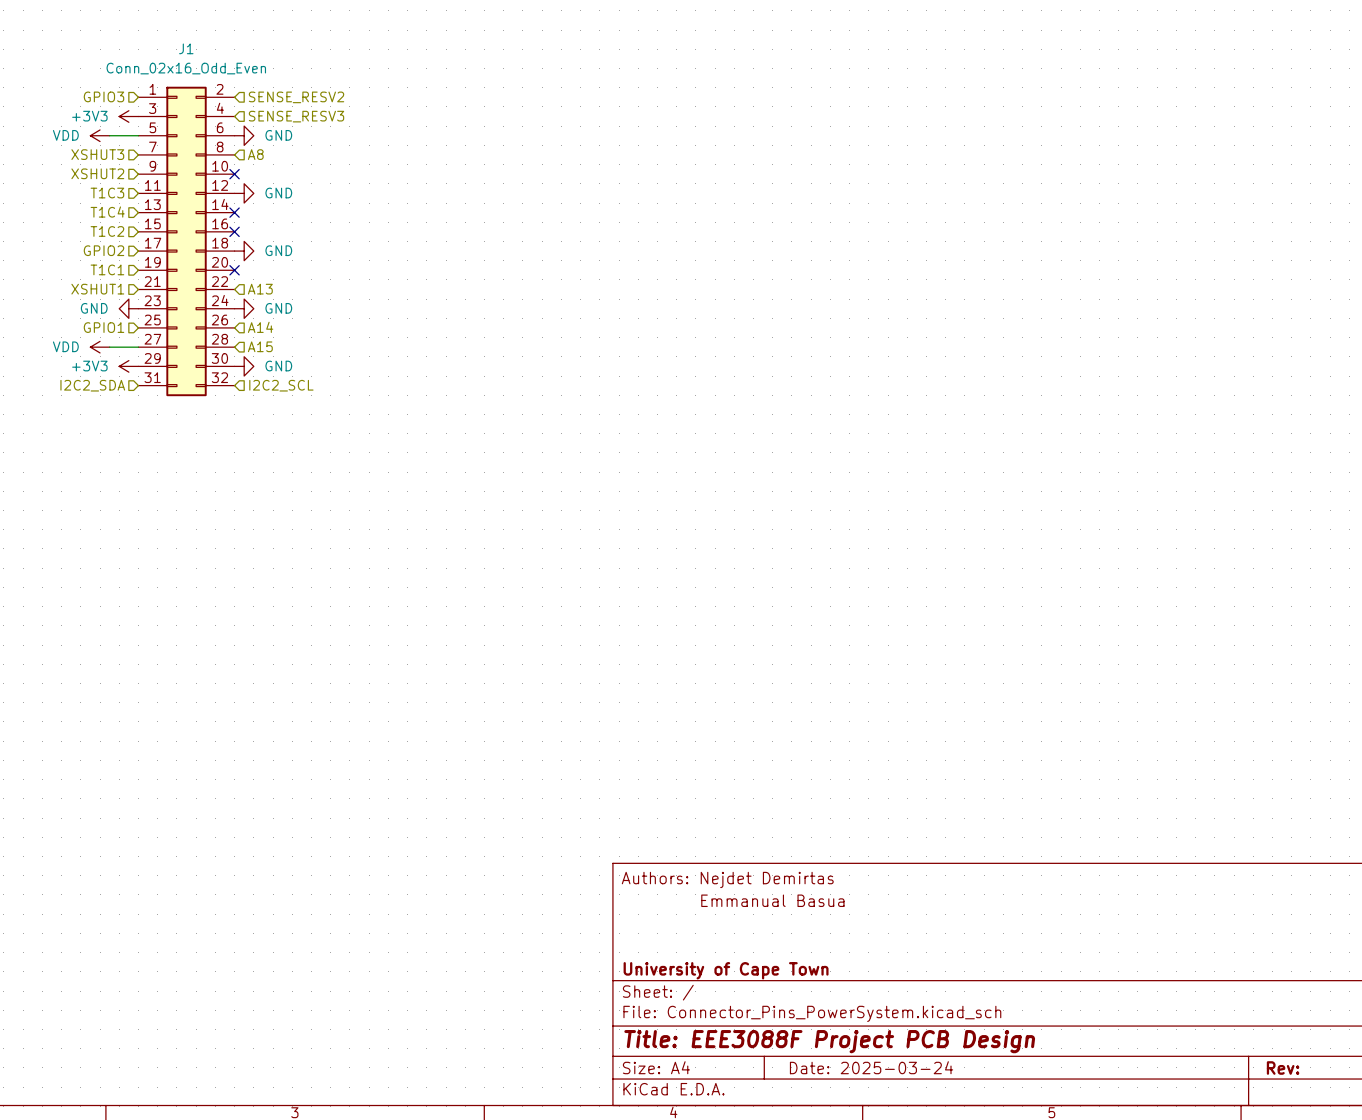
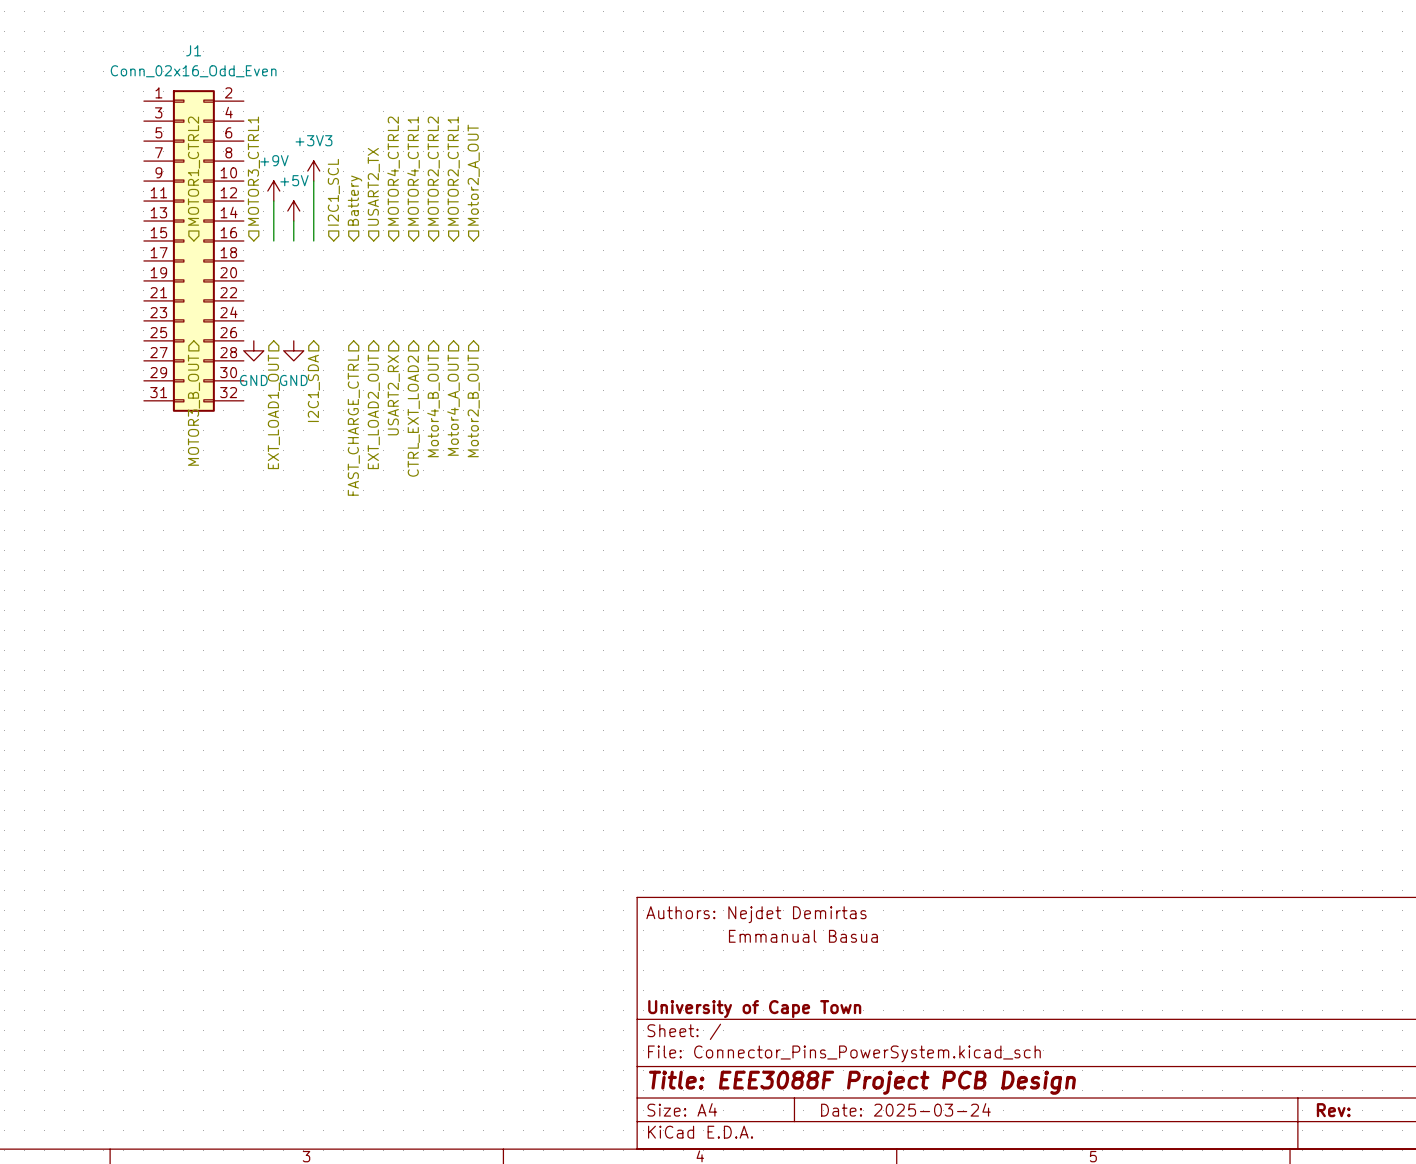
hierarchical label: GPIO3 (103, 96) -> none
hierarchical label: SENSE_RESV2 (296, 97) -> none
power symbol: +3V3 (128, 116) -> none
hierarchical label: SENSE_RESV3 (296, 116) -> none
power symbol: VDD (100, 135) -> none
wire: (109, 135) (138, 135) -> none
power symbol: GND (244, 135) -> none
hierarchical label: XSHUT3 (97, 154) -> none
hierarchical label: A8 (255, 154) -> none
hierarchical label: none -> MOTOR1_CTRL2 (193, 171)
hierarchical label: none -> MOTOR3_CTRL1 (253, 171)
power symbol: none -> +3V3 (313, 171)
hierarchical label: none -> MOTOR4_CTRL2 (393, 171)
hierarchical label: none -> MOTOR4_CTRL1 (413, 171)
hierarchical label: none -> MOTOR2_CTRL2 (433, 171)
hierarchical label: none -> MOTOR2_CTRL1 (453, 171)
hierarchical label: none -> Motor2_A_OUT (473, 175)
hierarchical label: XSHUT2 (97, 173) -> none
no-connect mark: (234, 174) -> none
wire: none -> (313, 181) (313, 240)
hierarchical label: none -> USART2_TX (373, 186)
power symbol: none -> +9V (273, 191)
hierarchical label: none -> I2C1_SCL (333, 192)
hierarchical label: T1C3 (107, 193) -> none
power symbol: GND (244, 193) -> none
wire: none -> (273, 201) (273, 240)
hierarchical label: none -> Battery (355, 200)
power symbol: none -> +5V (293, 211)
hierarchical label: T1C4 (107, 212) -> none
no-connect mark: (234, 212) -> none
wire: none -> (293, 221) (293, 240)
hierarchical label: T1C2 (107, 231) -> none
no-connect mark: (234, 231) -> none
hierarchical label: GPIO2 (103, 250) -> none
power symbol: GND (244, 251) -> none
hierarchical label: T1C1 (107, 269) -> none
no-connect mark: (234, 270) -> none
hierarchical label: XSHUT1 (97, 289) -> none
hierarchical label: A13 (260, 289) -> none
power symbol: GND (128, 308) -> none
power symbol: GND (244, 308) -> none
hierarchical label: GPIO1 (103, 327) -> none
hierarchical label: A14 (260, 327) -> none
power symbol: none -> GND (253, 350)
power symbol: none -> GND (293, 350)
hierarchical label: A15 (260, 346) -> none
power symbol: VDD (100, 347) -> none
wire: (109, 347) (138, 347) -> none
power symbol: +3V3 (128, 366) -> none
power symbol: GND (244, 366) -> none
hierarchical label: none -> USART2_RX (393, 395)
hierarchical label: I2C2_SDA (92, 385) -> none
hierarchical label: I2C2_SCL (281, 385) -> I2C1_SDA (313, 388)
hierarchical label: none -> Motor4_A_OUT (453, 405)
hierarchical label: none -> Motor4_B_OUT (433, 405)
hierarchical label: none -> Motor2_B_OUT (473, 405)
hierarchical label: none -> MOTOR3_B_OUT (193, 410)
hierarchical label: none -> EXT_LOAD1_OUT (273, 411)
hierarchical label: none -> EXT_LOAD2_OUT (373, 411)
hierarchical label: none -> CTRL_EXT_LOAD2 (413, 416)
hierarchical label: none -> FAST_CHARGE_CTRL (353, 425)

